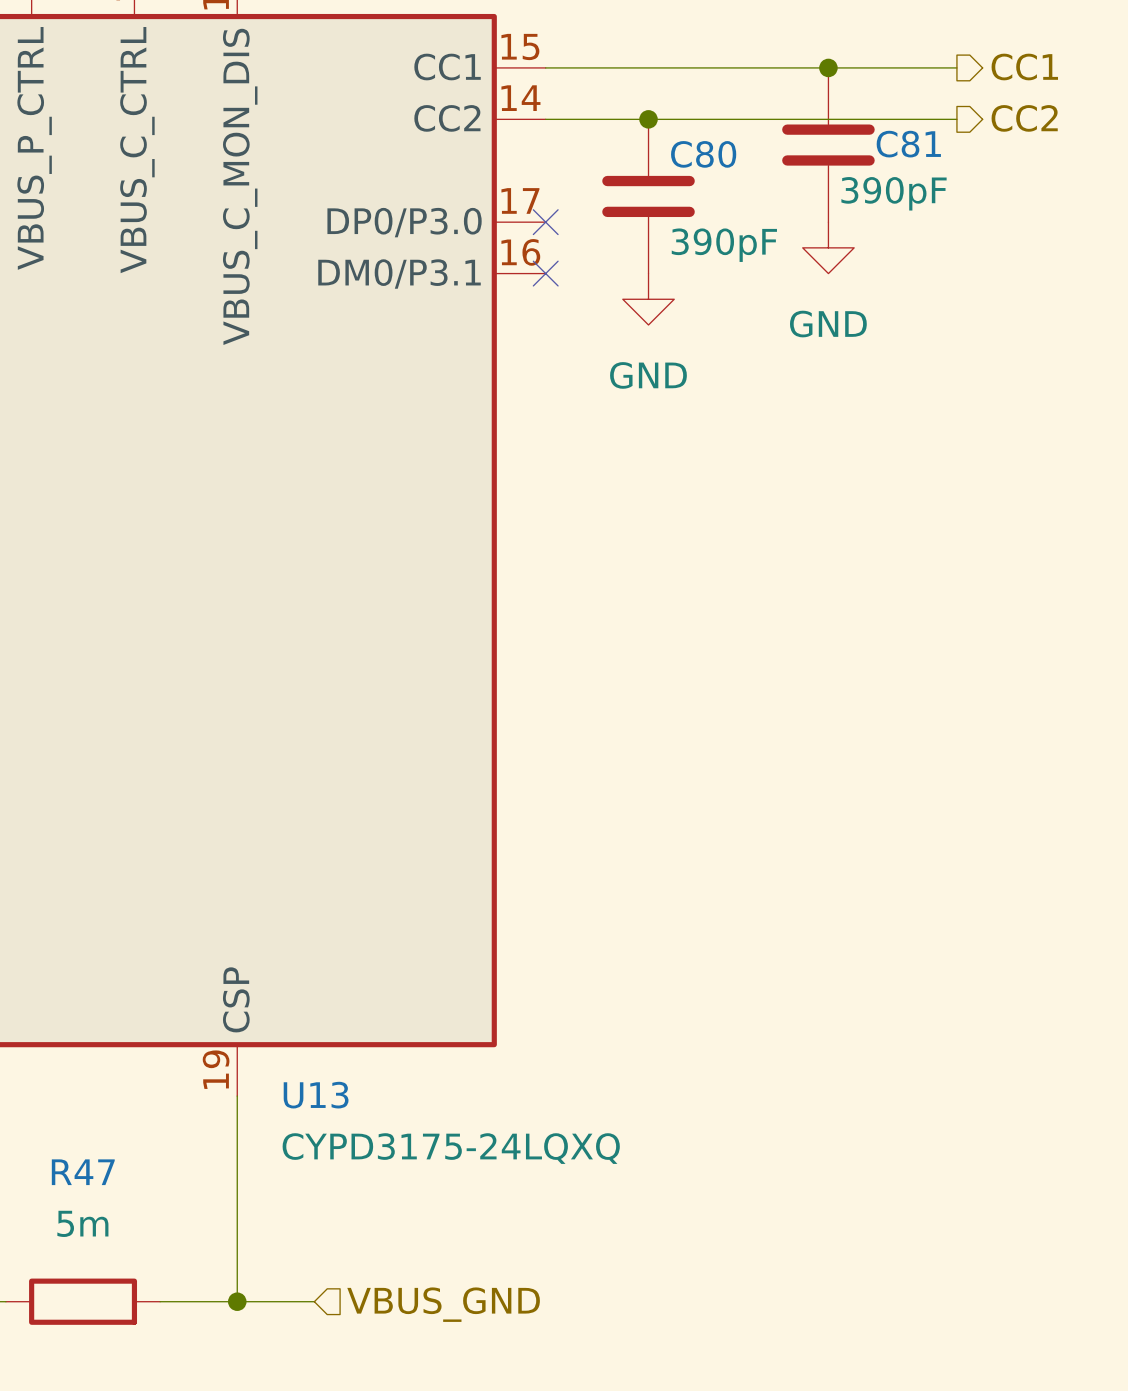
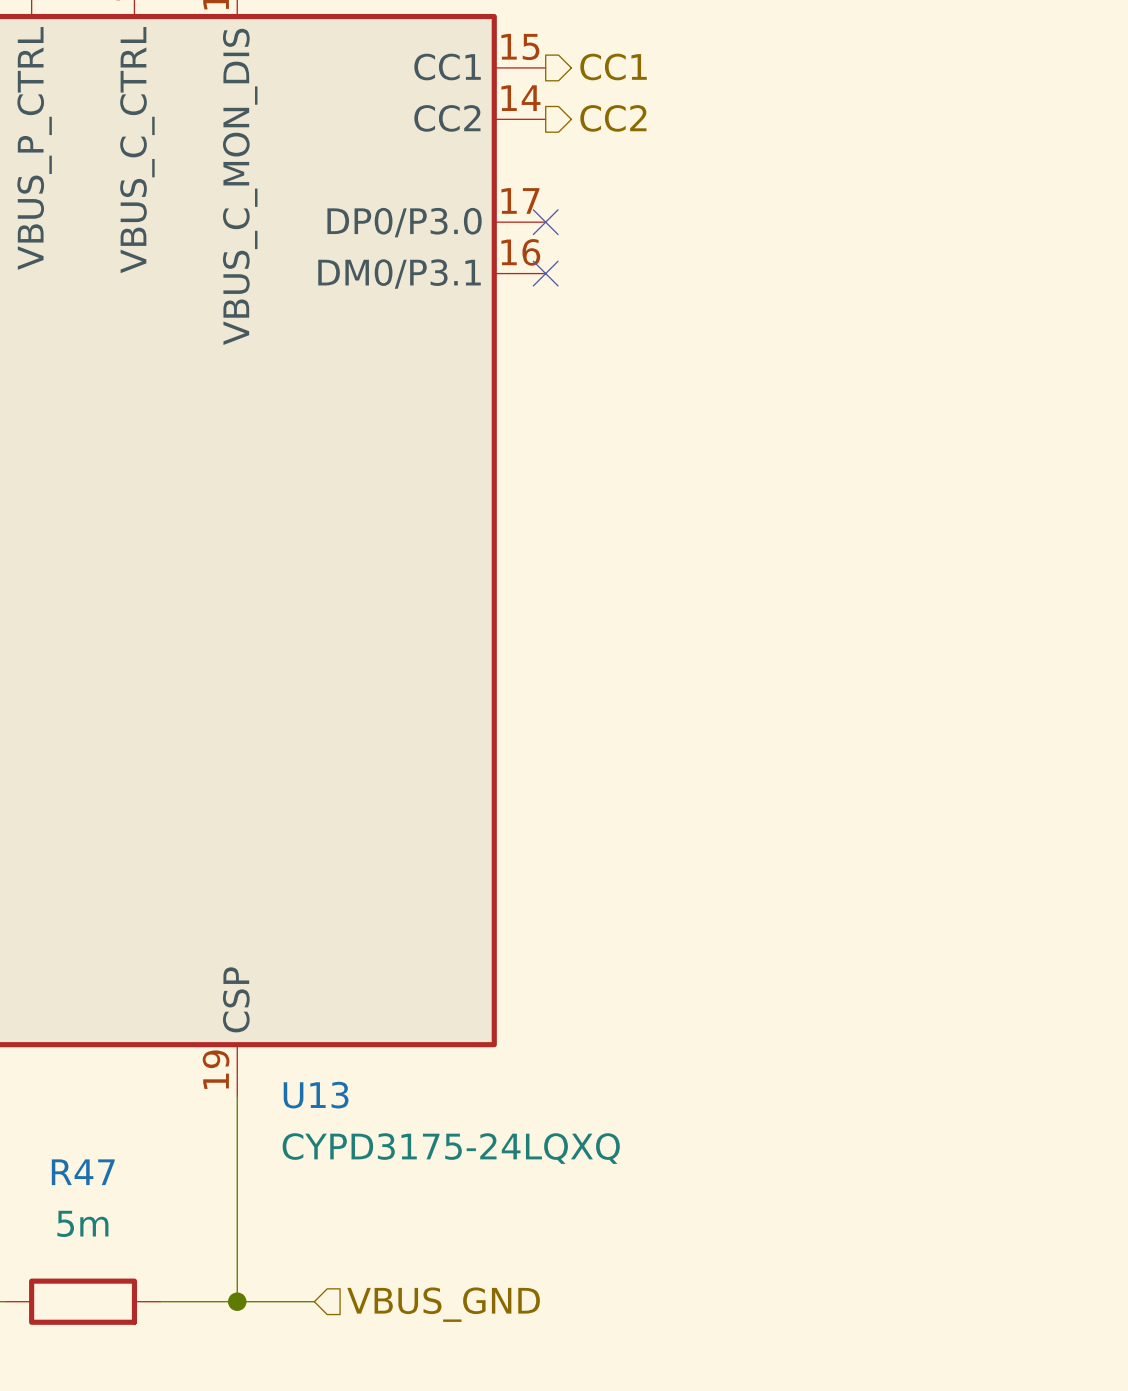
wire: (545, 67) (956, 67) -> none
junction: (828, 67) -> none
hierarchical label position: CC1 (1024, 67) -> CC1 (613, 67)
hierarchical label position: CC2 (1024, 118) -> CC2 (613, 118)
wire: (545, 119) (956, 119) -> none
junction: (648, 119) -> none
C81: 390pF (828, 145) -> none
C80: 390pF (648, 196) -> none
power symbol: GND (828, 247) -> none
power symbol: GND (648, 299) -> none

